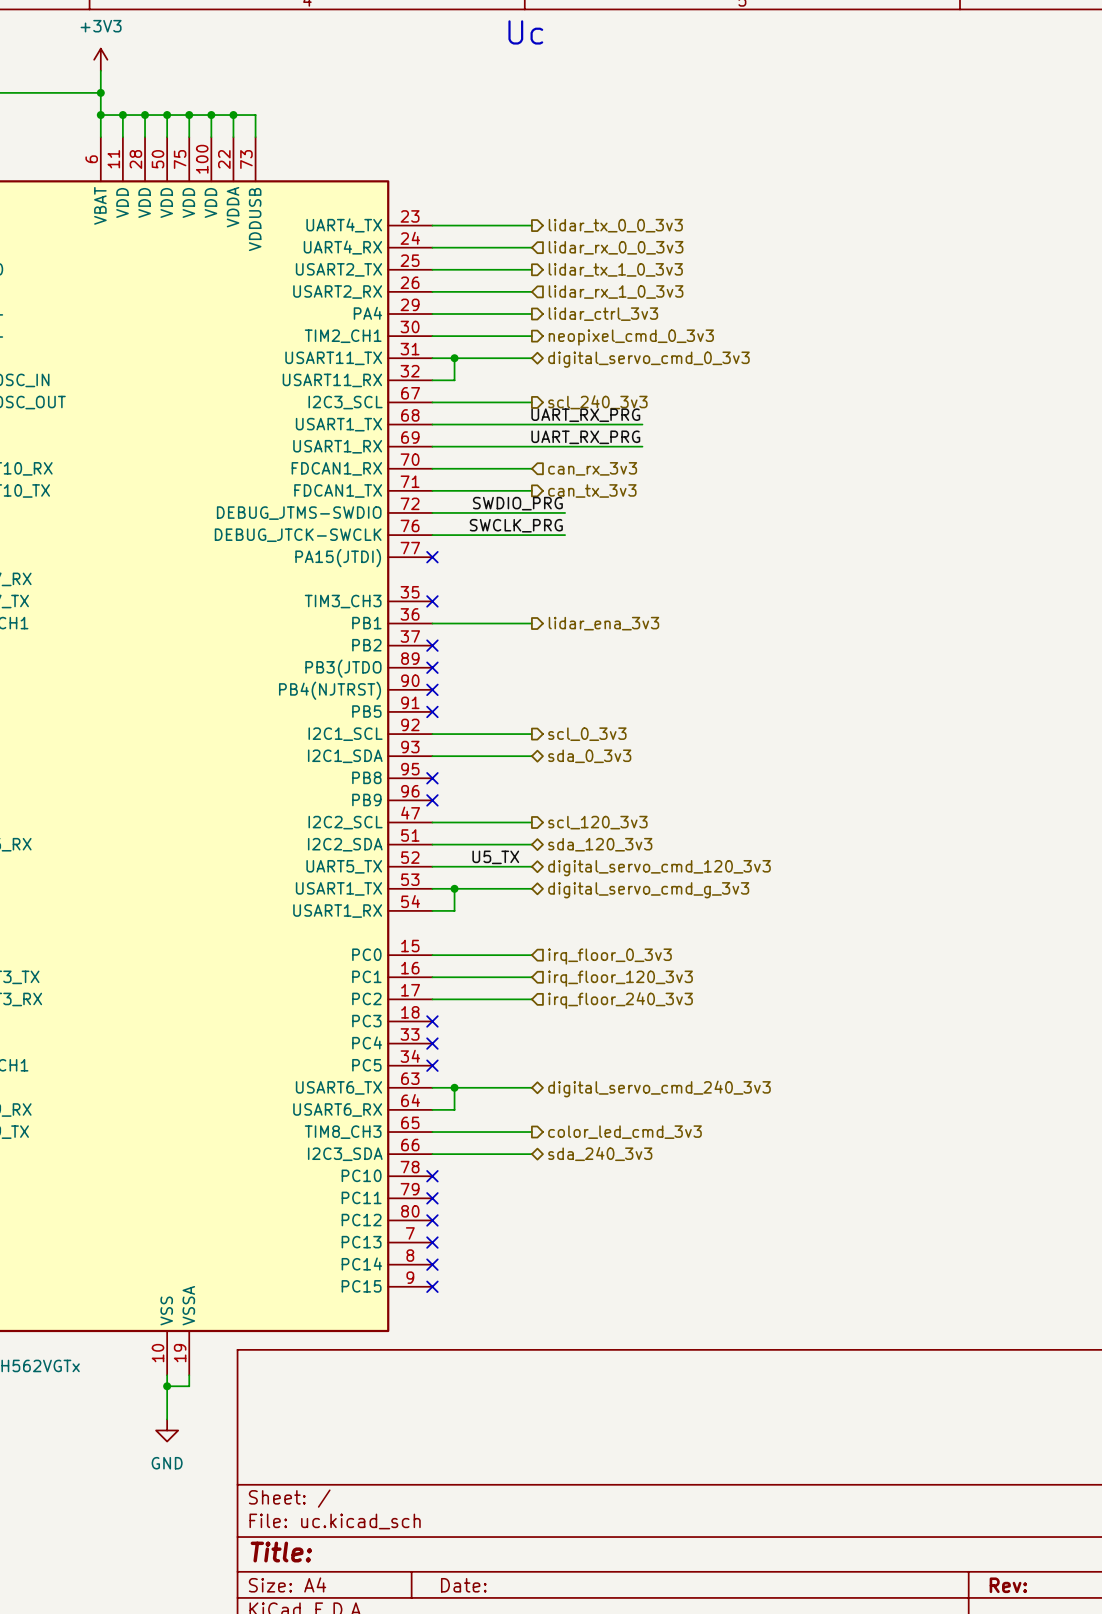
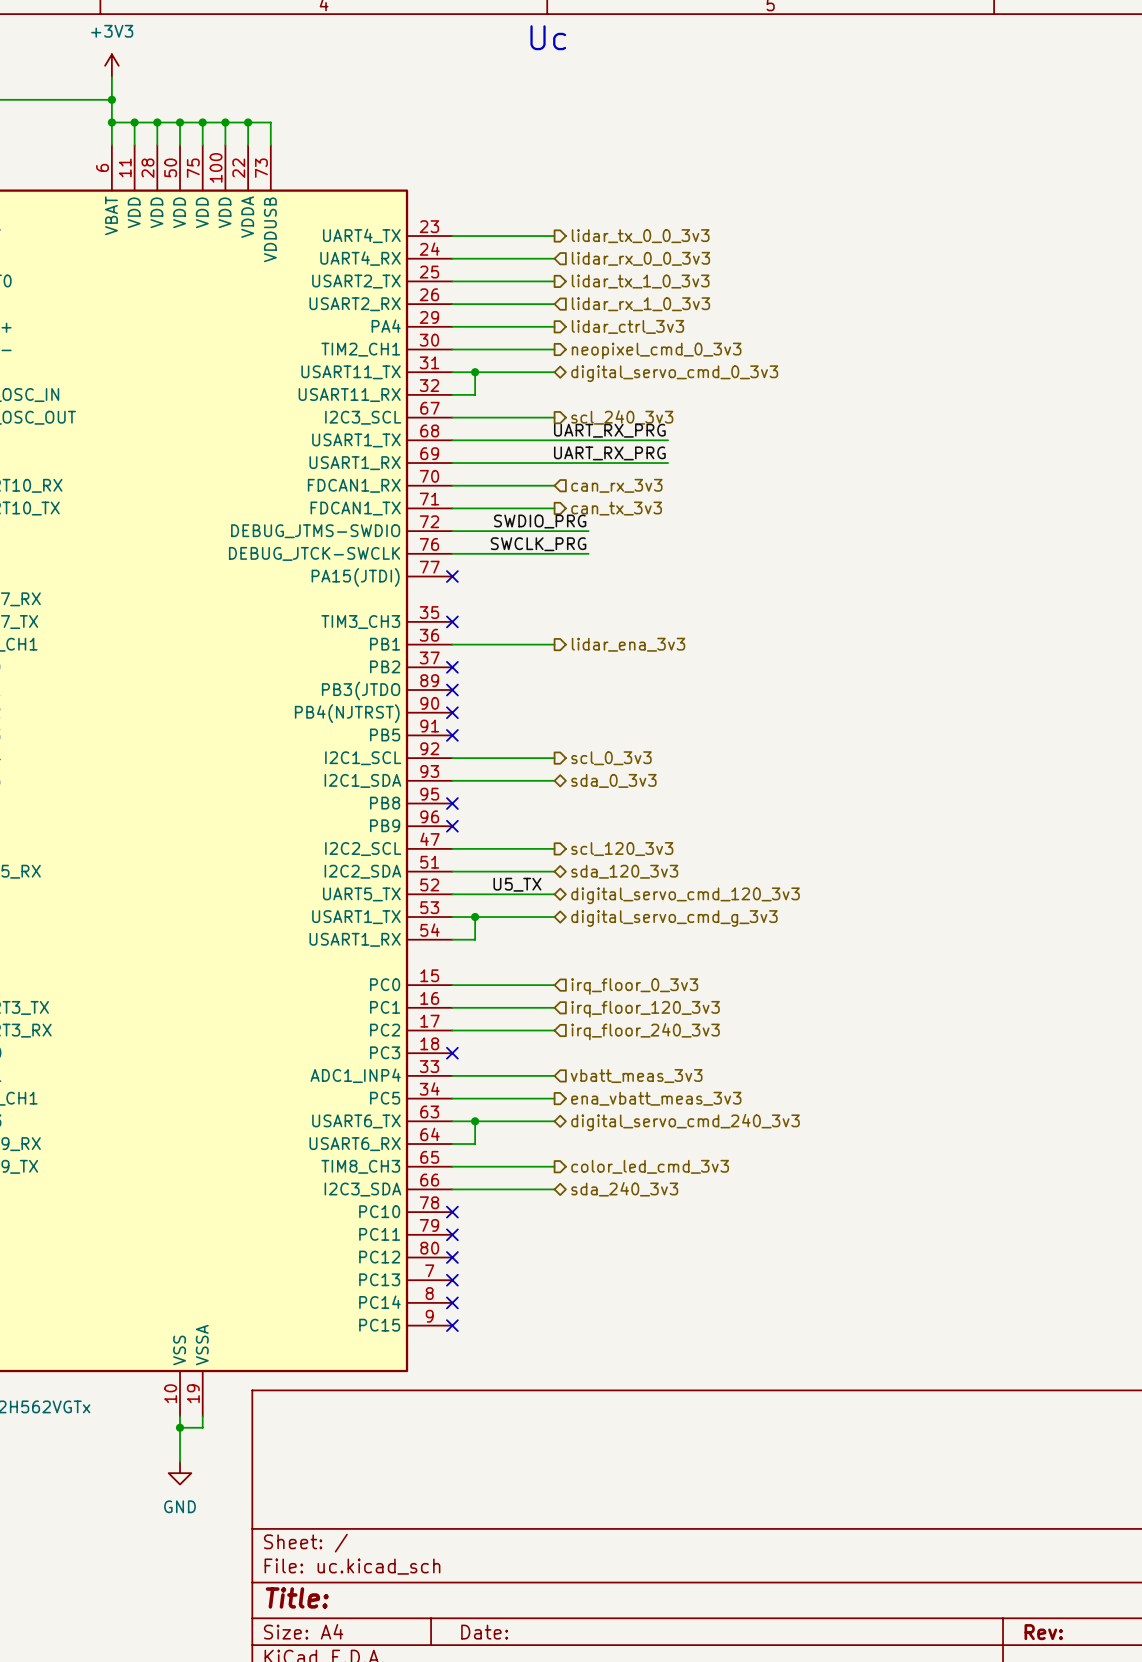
part pin name: PC4 (367, 1042) -> ADC1_INP4 (355, 1075)
wire: none -> (452, 1075) (554, 1075)
no-connect mark: (432, 1043) -> none
hierarchical label: none -> vbatt_meas_3v3 (636, 1076)
wire: none -> (452, 1098) (554, 1098)
no-connect mark: (432, 1065) -> none
hierarchical label: none -> ena_vbatt_meas_3v3 (656, 1098)

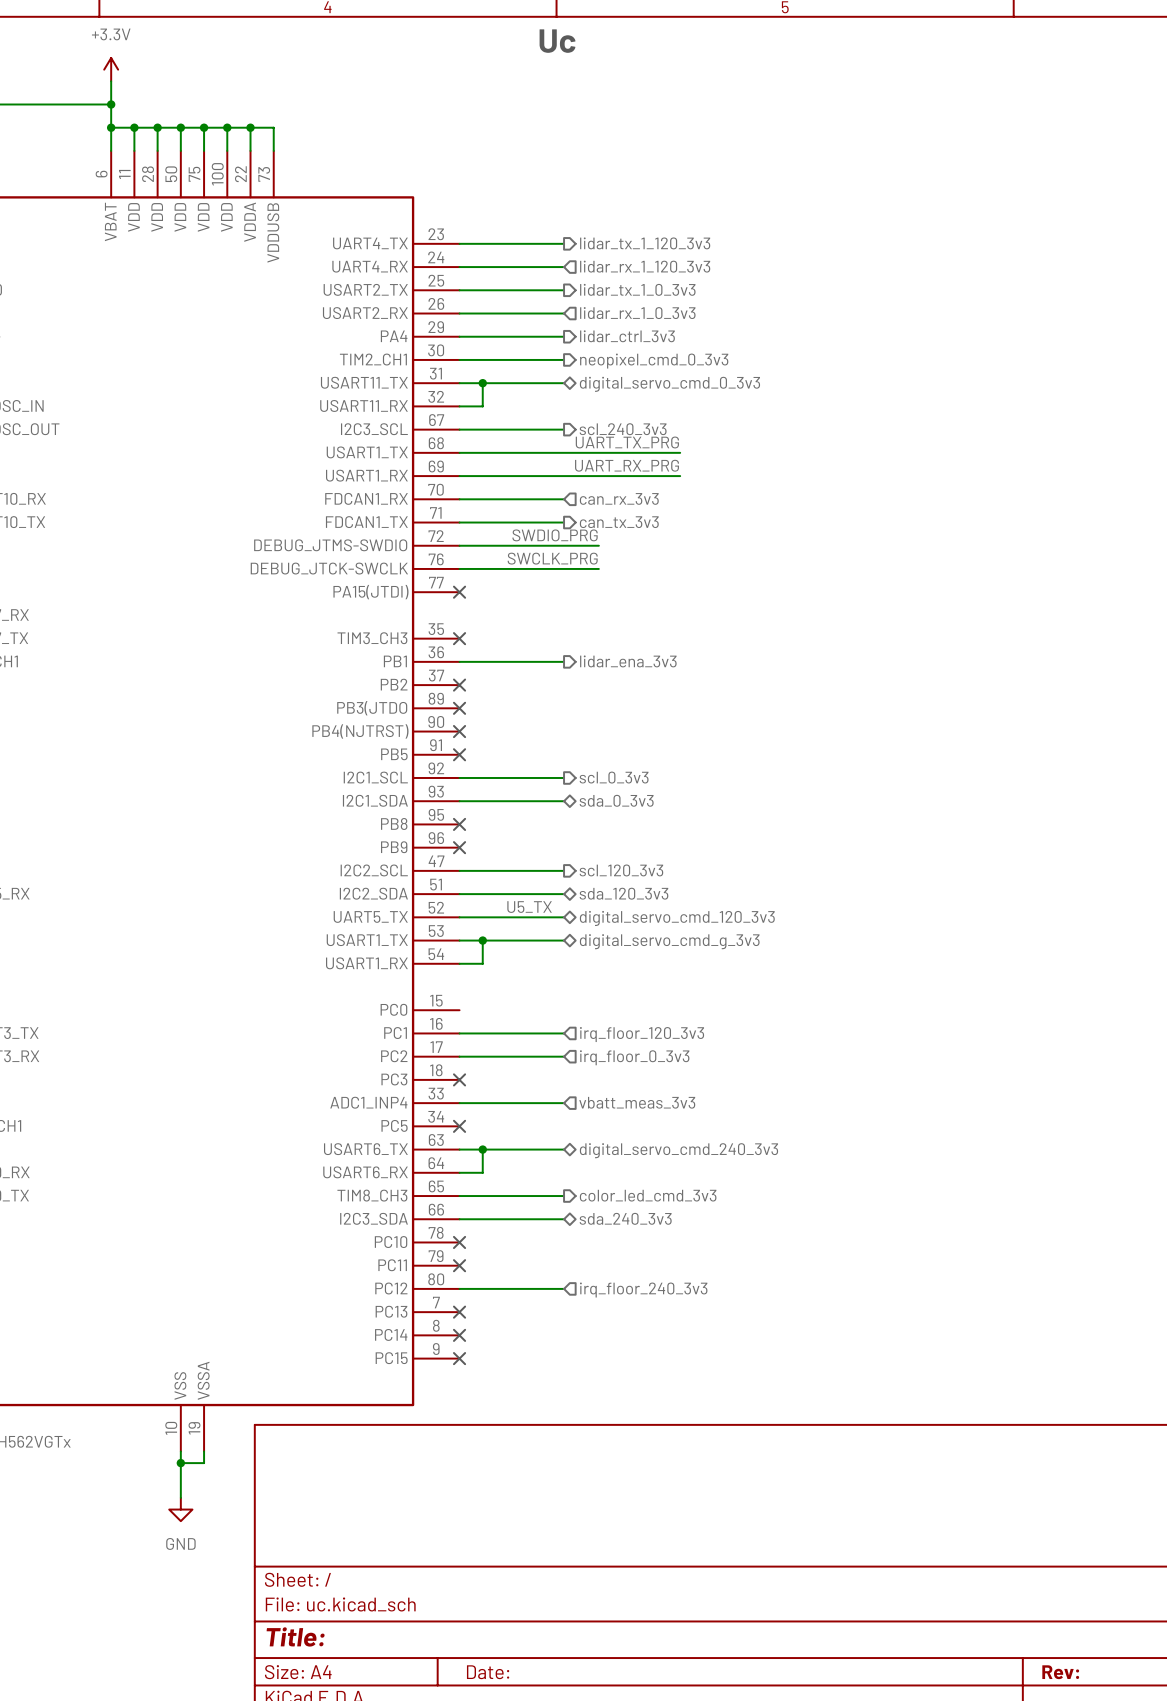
power symbol: +3V3 (111, 65) -> +3.3V (111, 69)
hierarchical label: lidar_tx_0_0_3v3 (640, 236) -> lidar_tx_1_120_3v3 (645, 243)
hierarchical label: lidar_rx_0_0_3v3 (640, 258) -> lidar_rx_1_120_3v3 (645, 266)
label: UART_RX_PRG (609, 430) -> UART_TX_PRG (627, 442)
wire: (452, 985) (554, 985) -> none
hierarchical label: irq_floor_0_3v3 (634, 986) -> none
hierarchical label: irq_floor_240_3v3 (645, 1031) -> irq_floor_0_3v3 (634, 1057)
wire: (452, 1098) (554, 1098) -> (459, 1288) (564, 1288)
no-connect mark: none -> (459, 1126)
hierarchical label: ena_vbatt_meas_3v3 (656, 1098) -> none
no-connect mark: (452, 1257) -> none
hierarchical label: none -> irq_floor_240_3v3 (643, 1290)

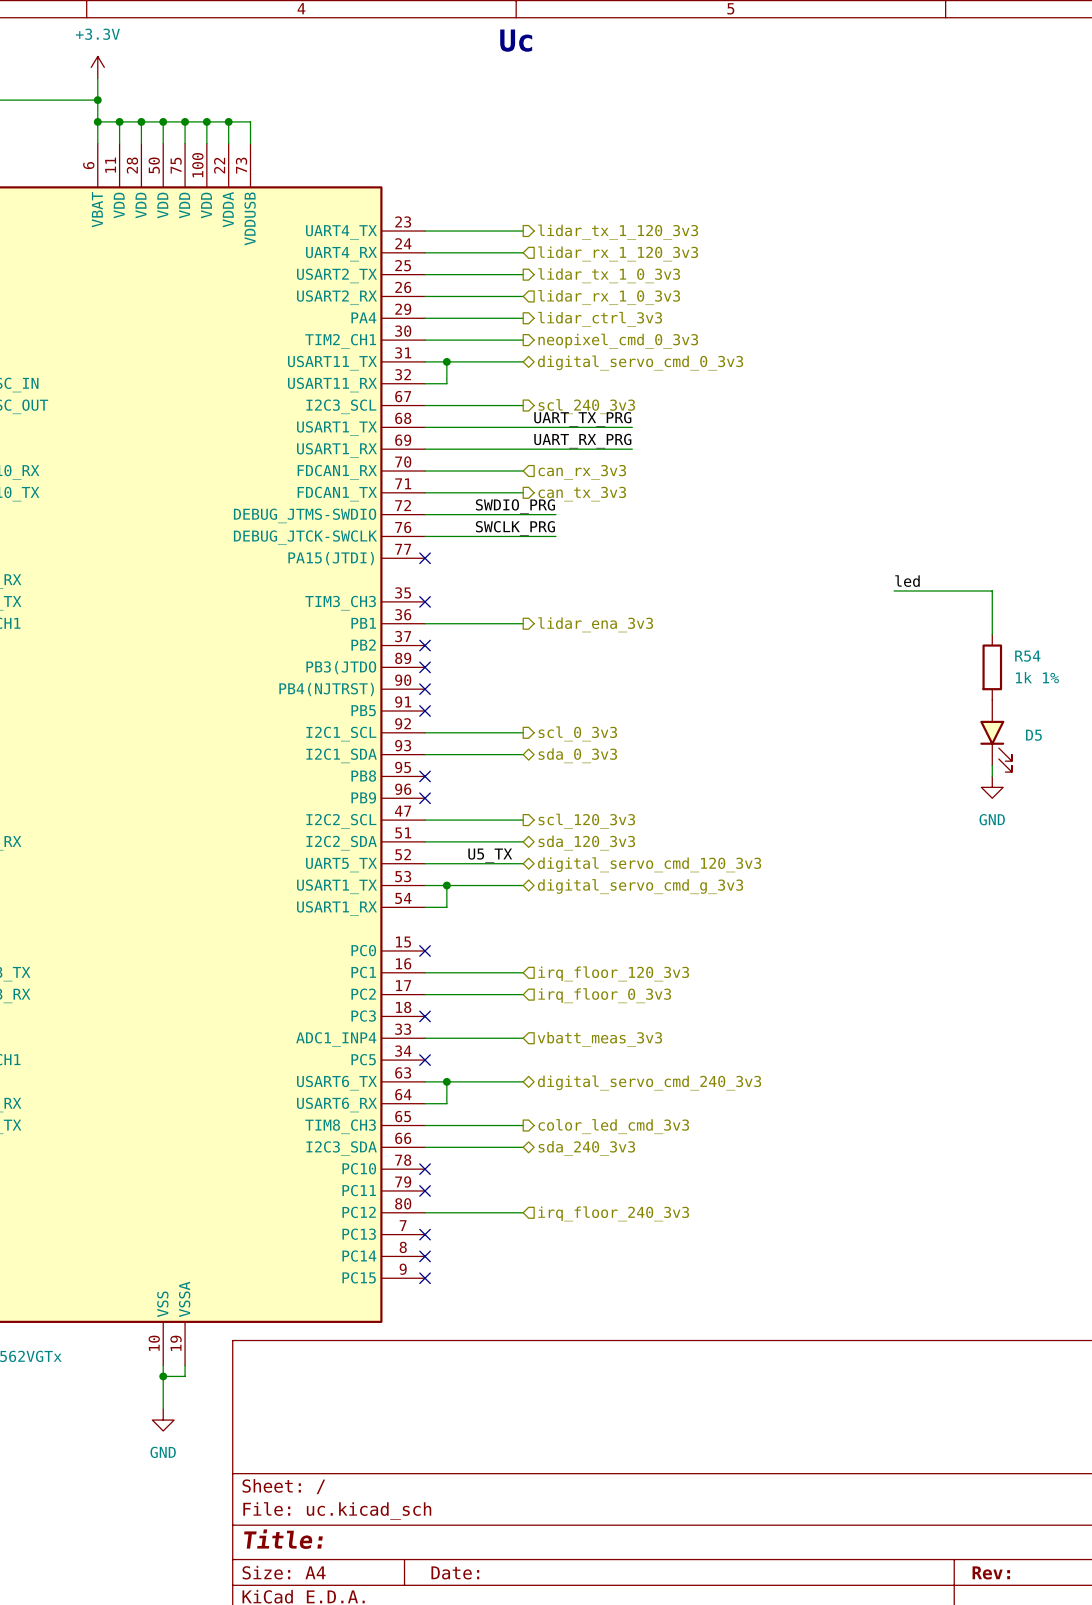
label: none -> led (907, 581)
wire: none -> (894, 590) (992, 590) (992, 634)
R54: none -> 1k 1% (992, 667)
D5: none -> (996, 736)
wire: none -> (992, 765) (992, 776)
power symbol: none -> GND (992, 787)
no-connect mark: none -> (425, 950)

